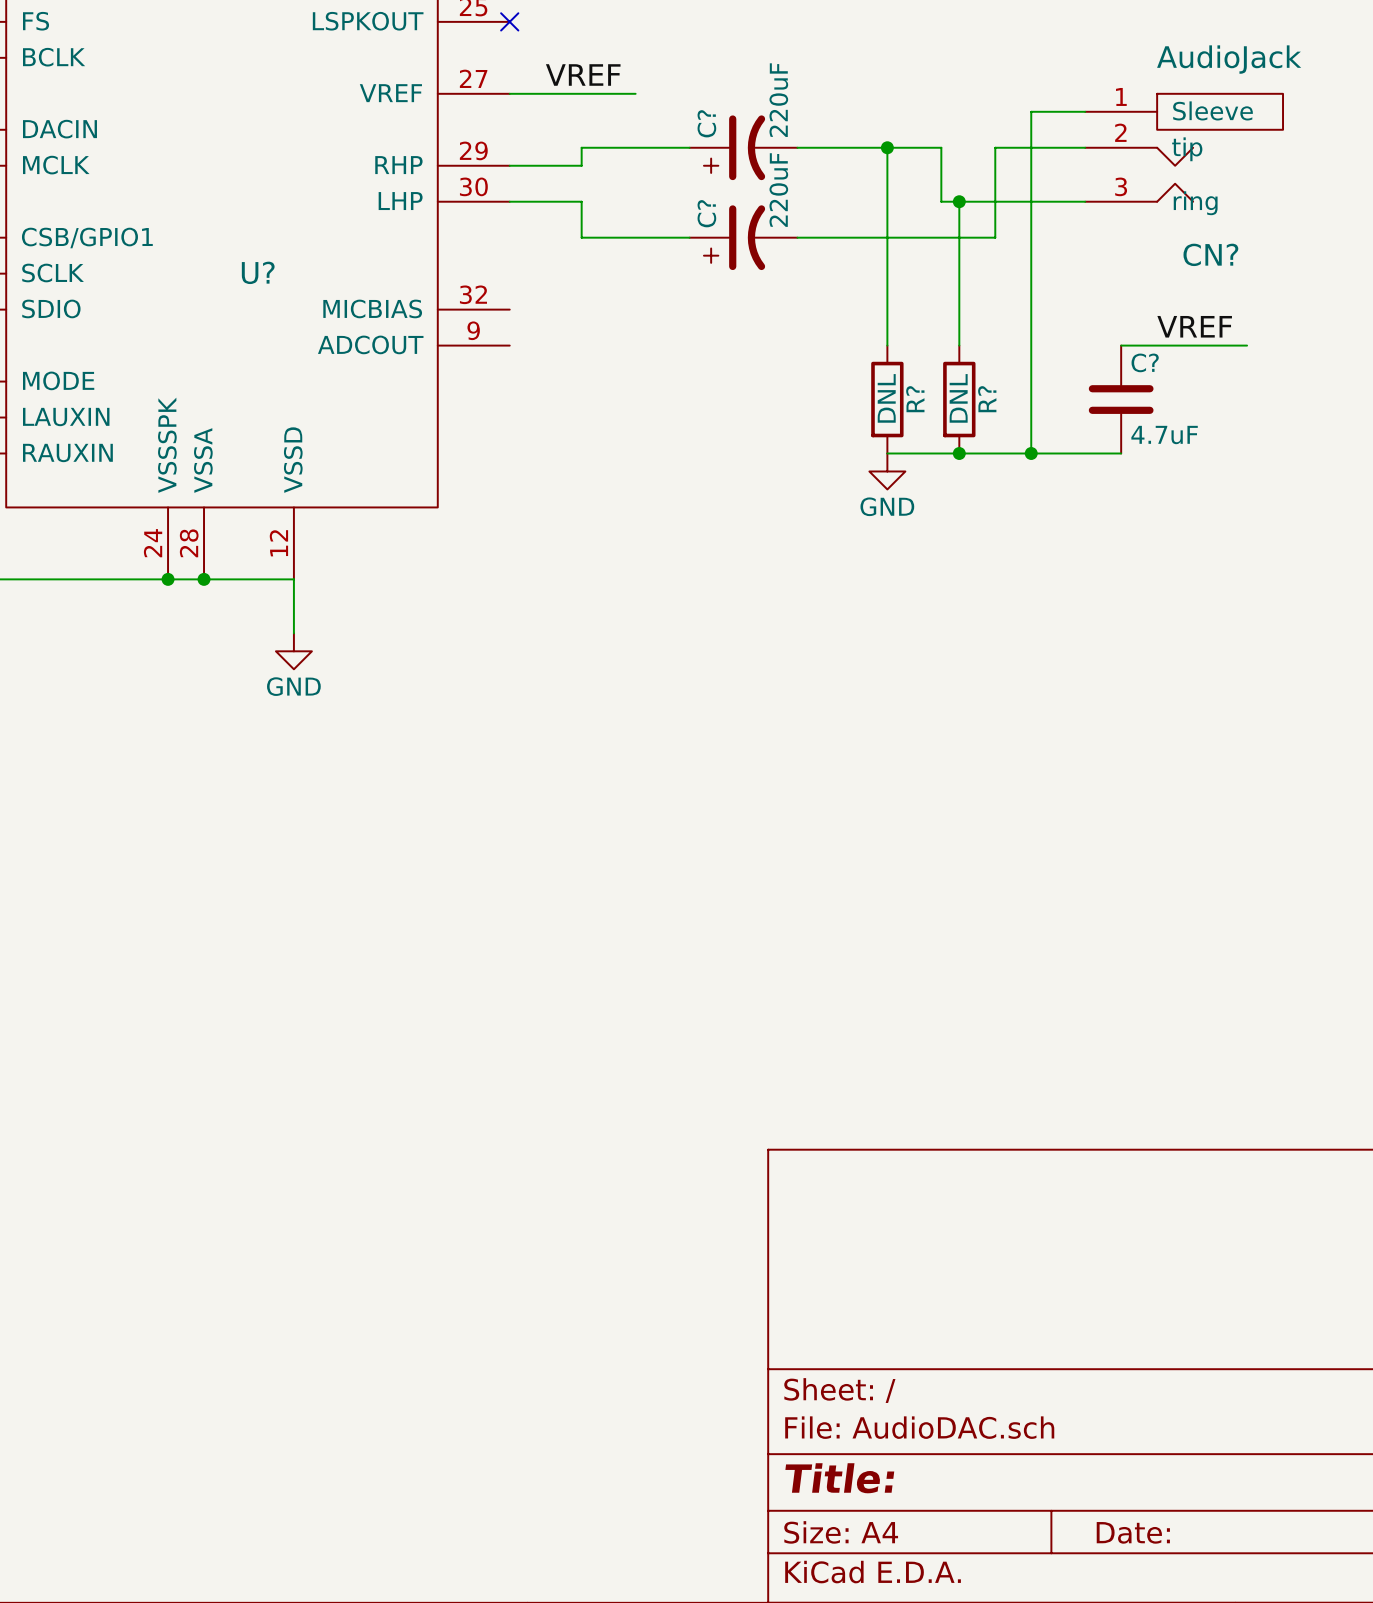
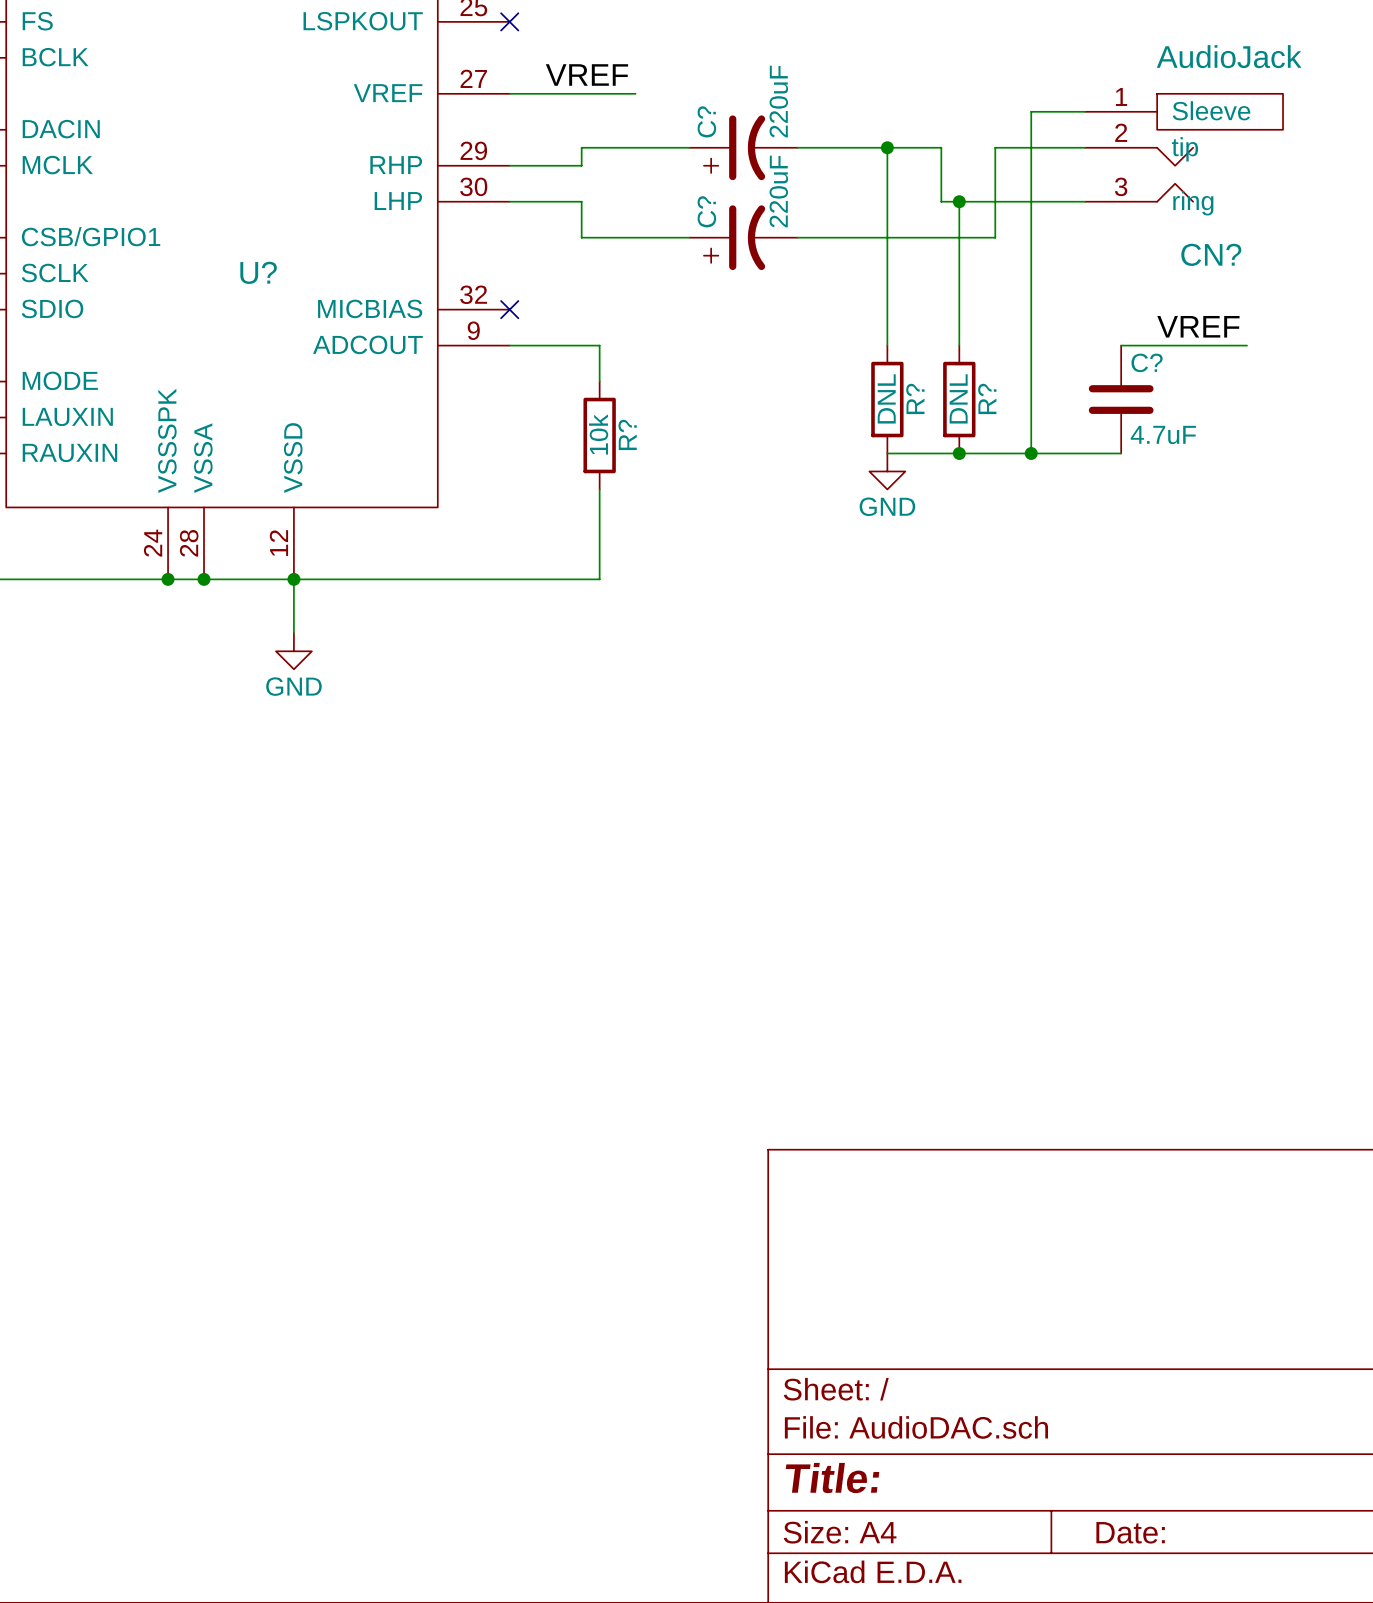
no-connect mark: none -> (509, 309)
wire: none -> (509, 345) (599, 345) (599, 381)
R?: none -> 10k (599, 435)
wire: none -> (599, 489) (599, 579) (293, 579)
junction: none -> (293, 579)

